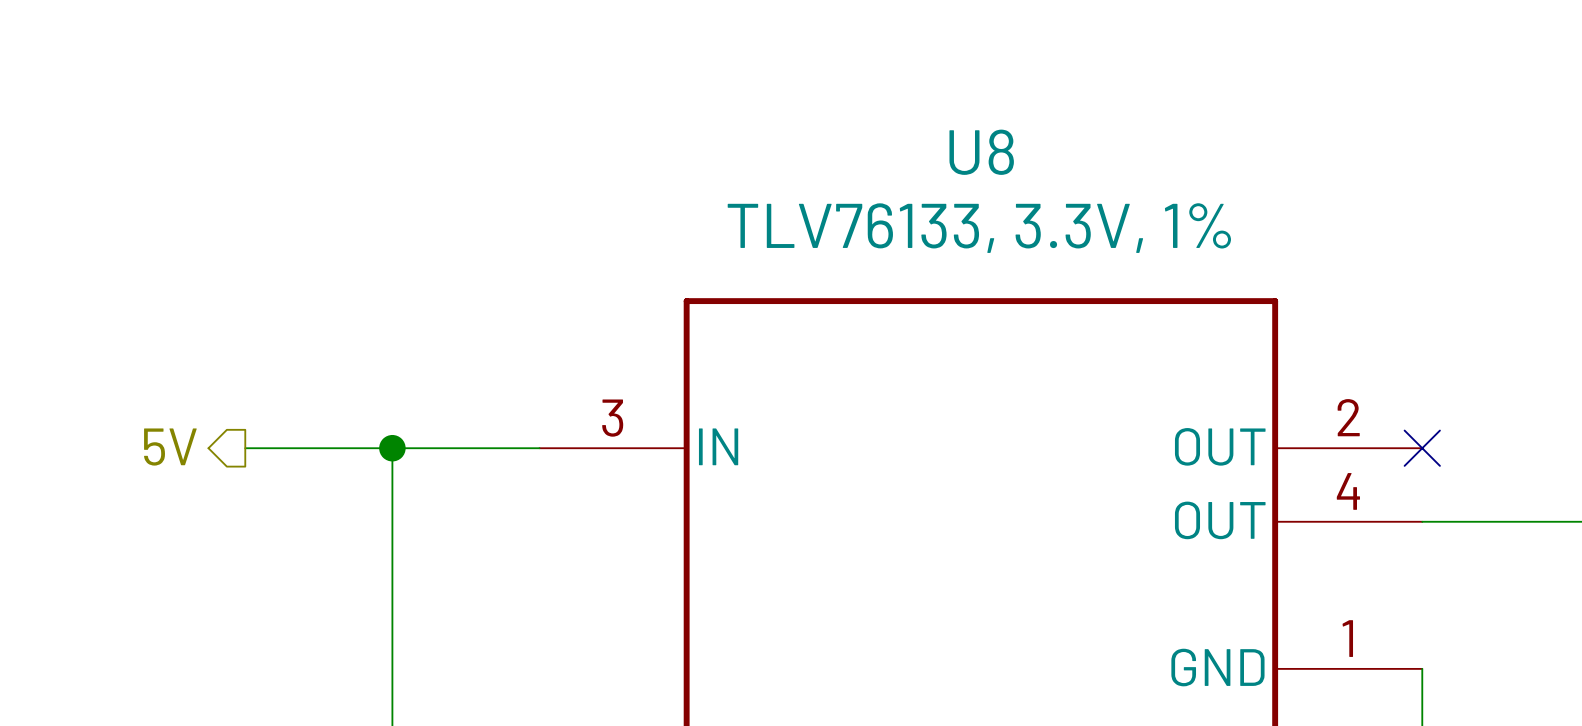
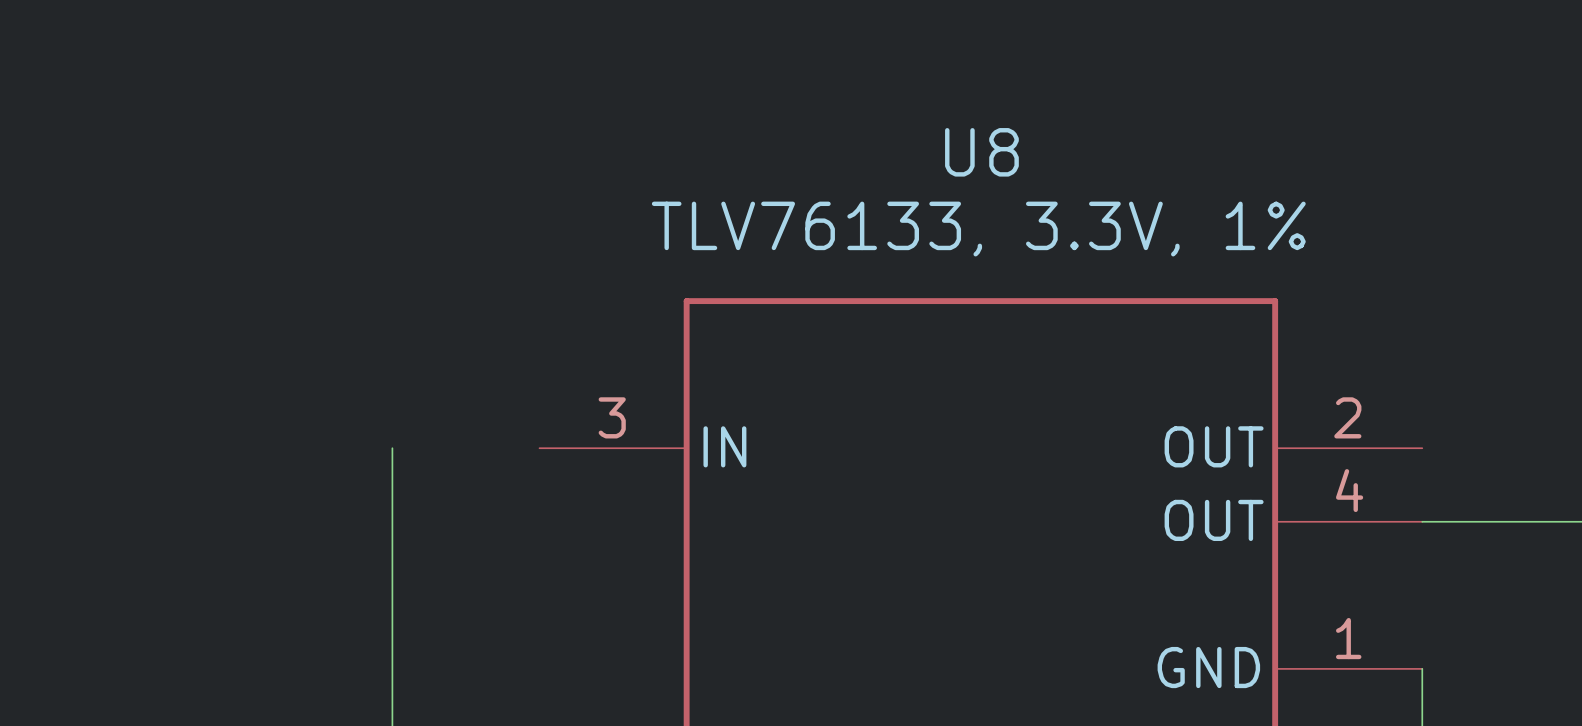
hierarchical label: 5V (170, 447) -> none
wire: (245, 448) (539, 448) -> none
junction: (392, 448) -> none
no-connect mark: (1422, 448) -> none

